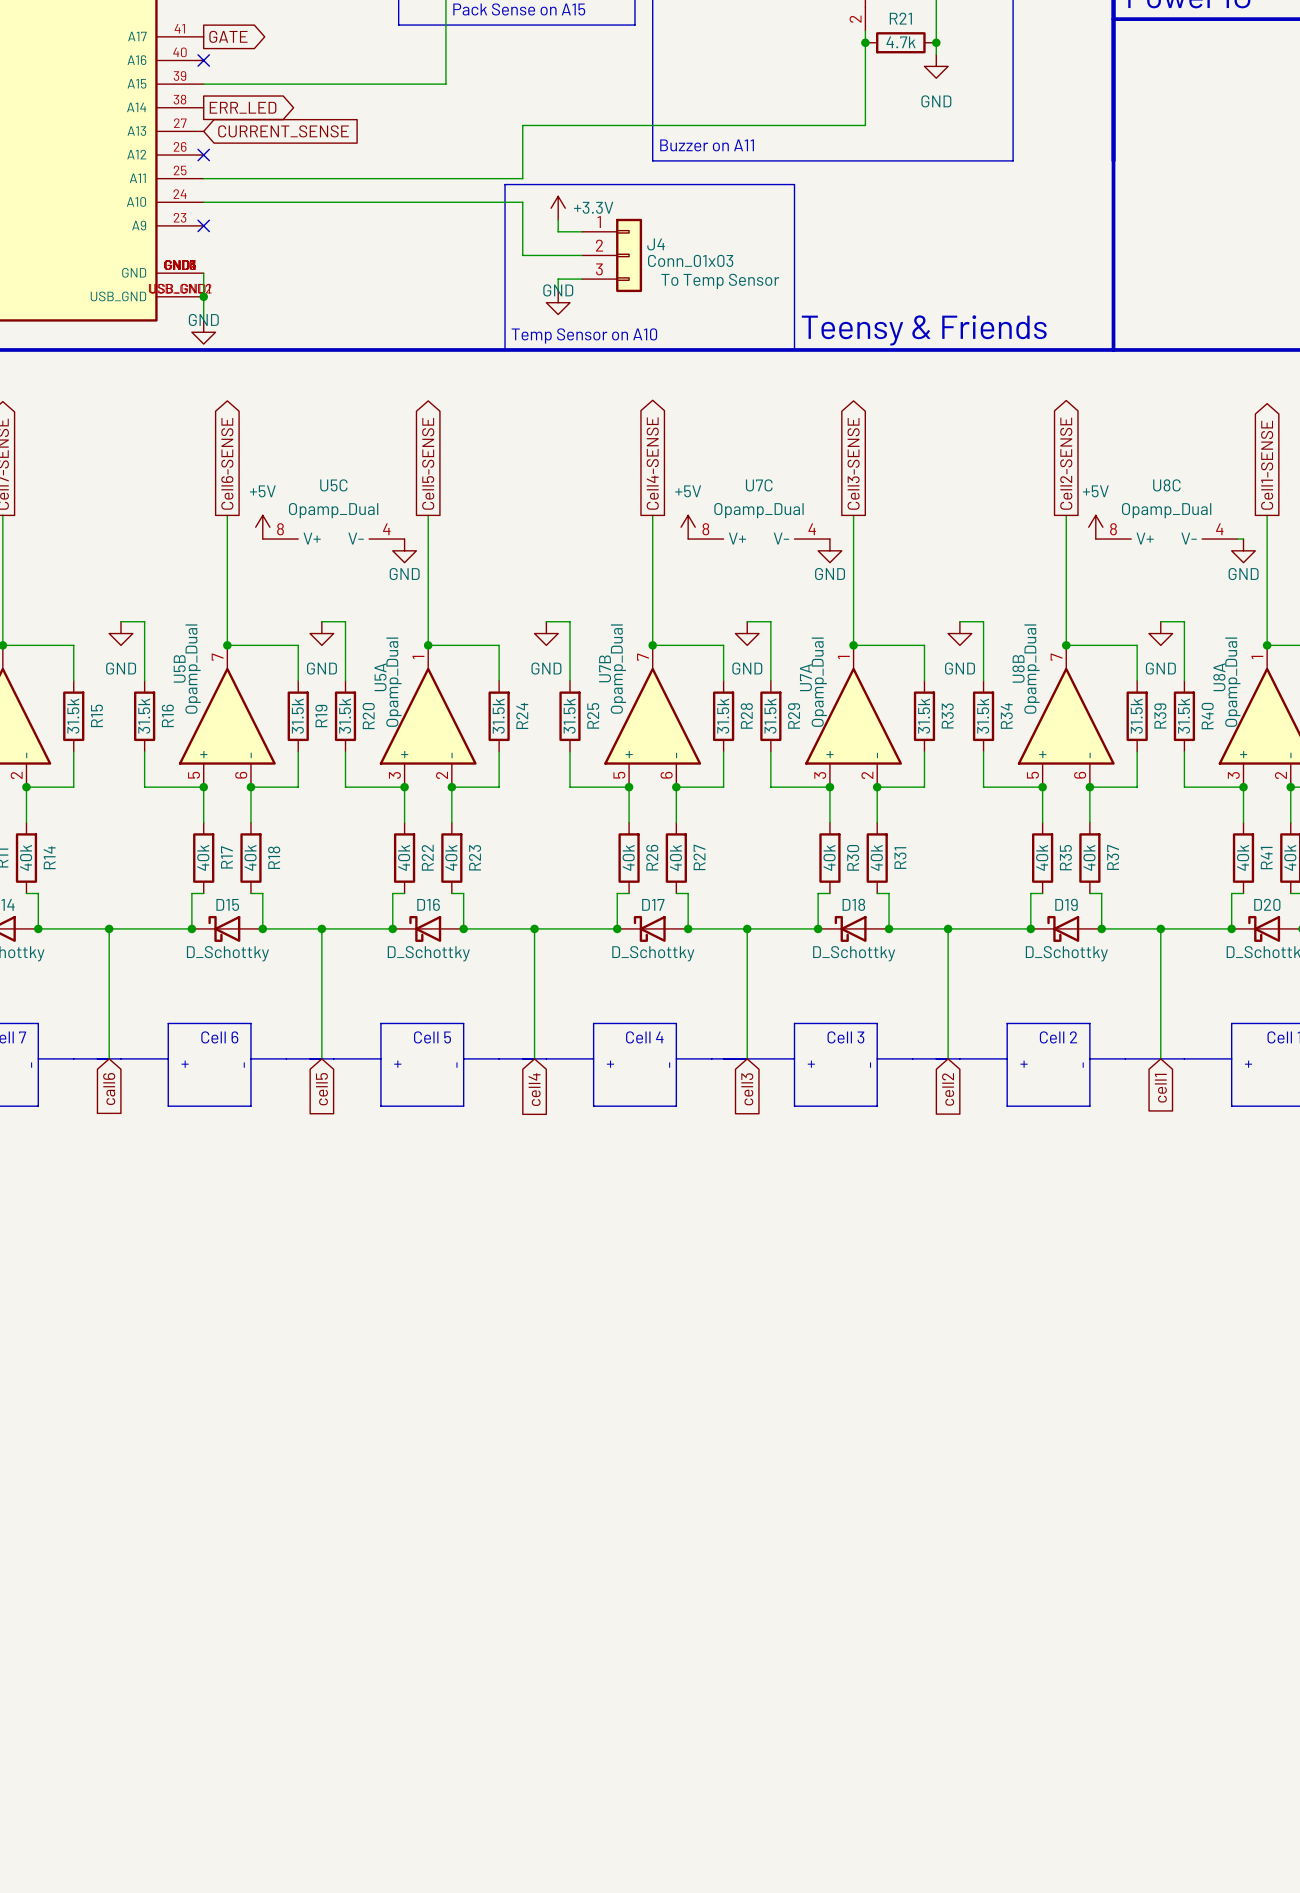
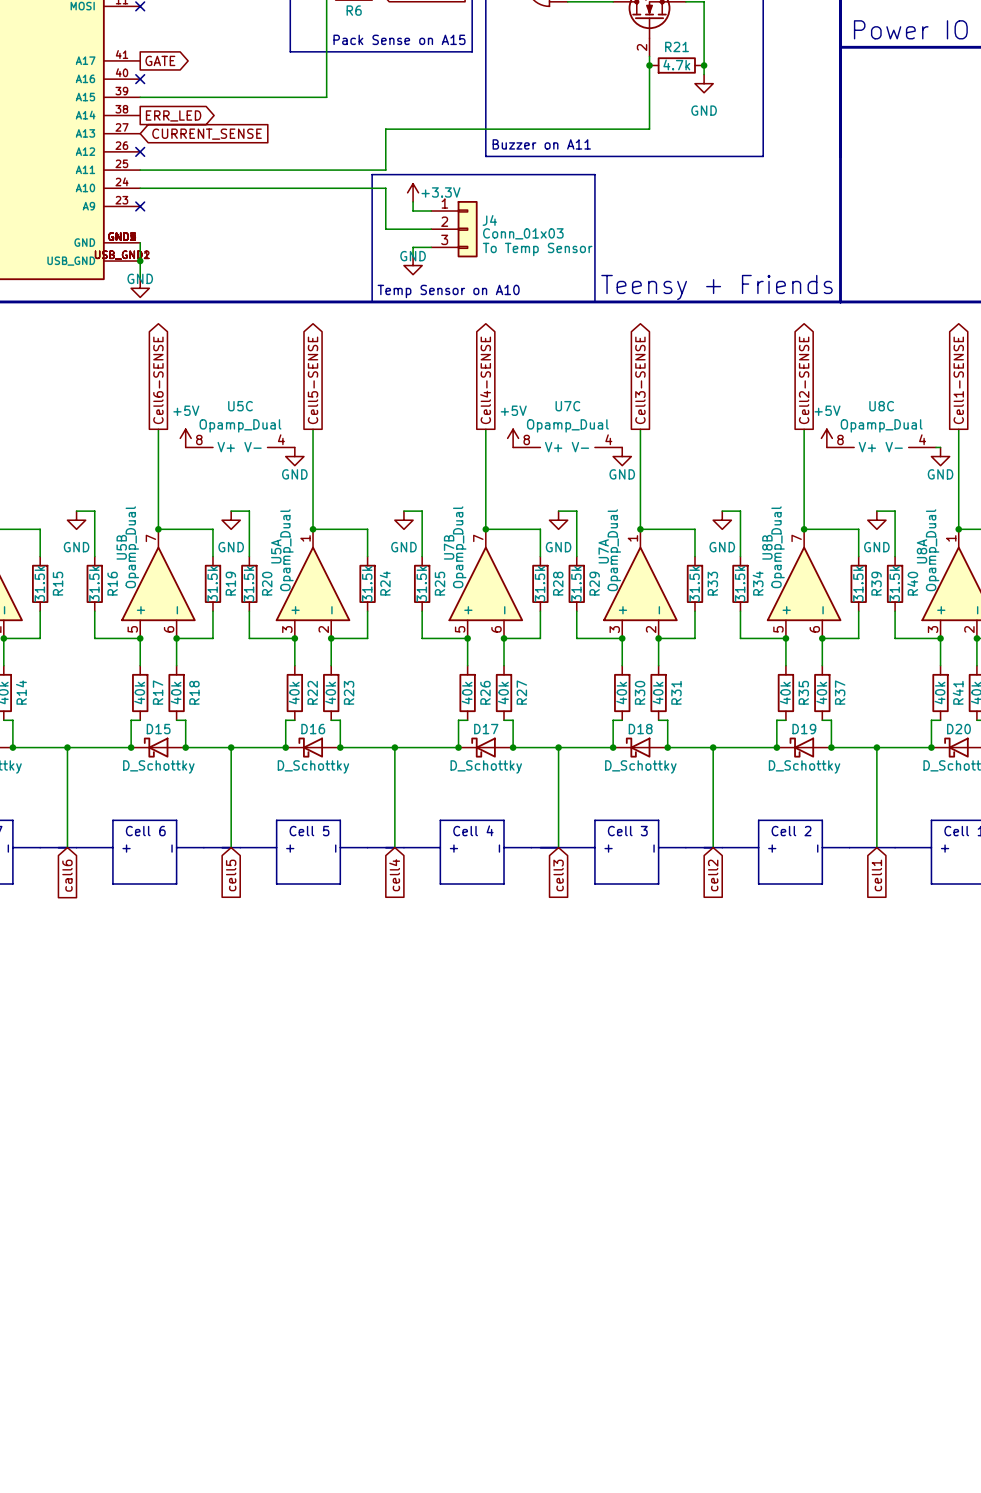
text: Teensy & Friends (924, 330) -> Teensy + Friends (717, 287)

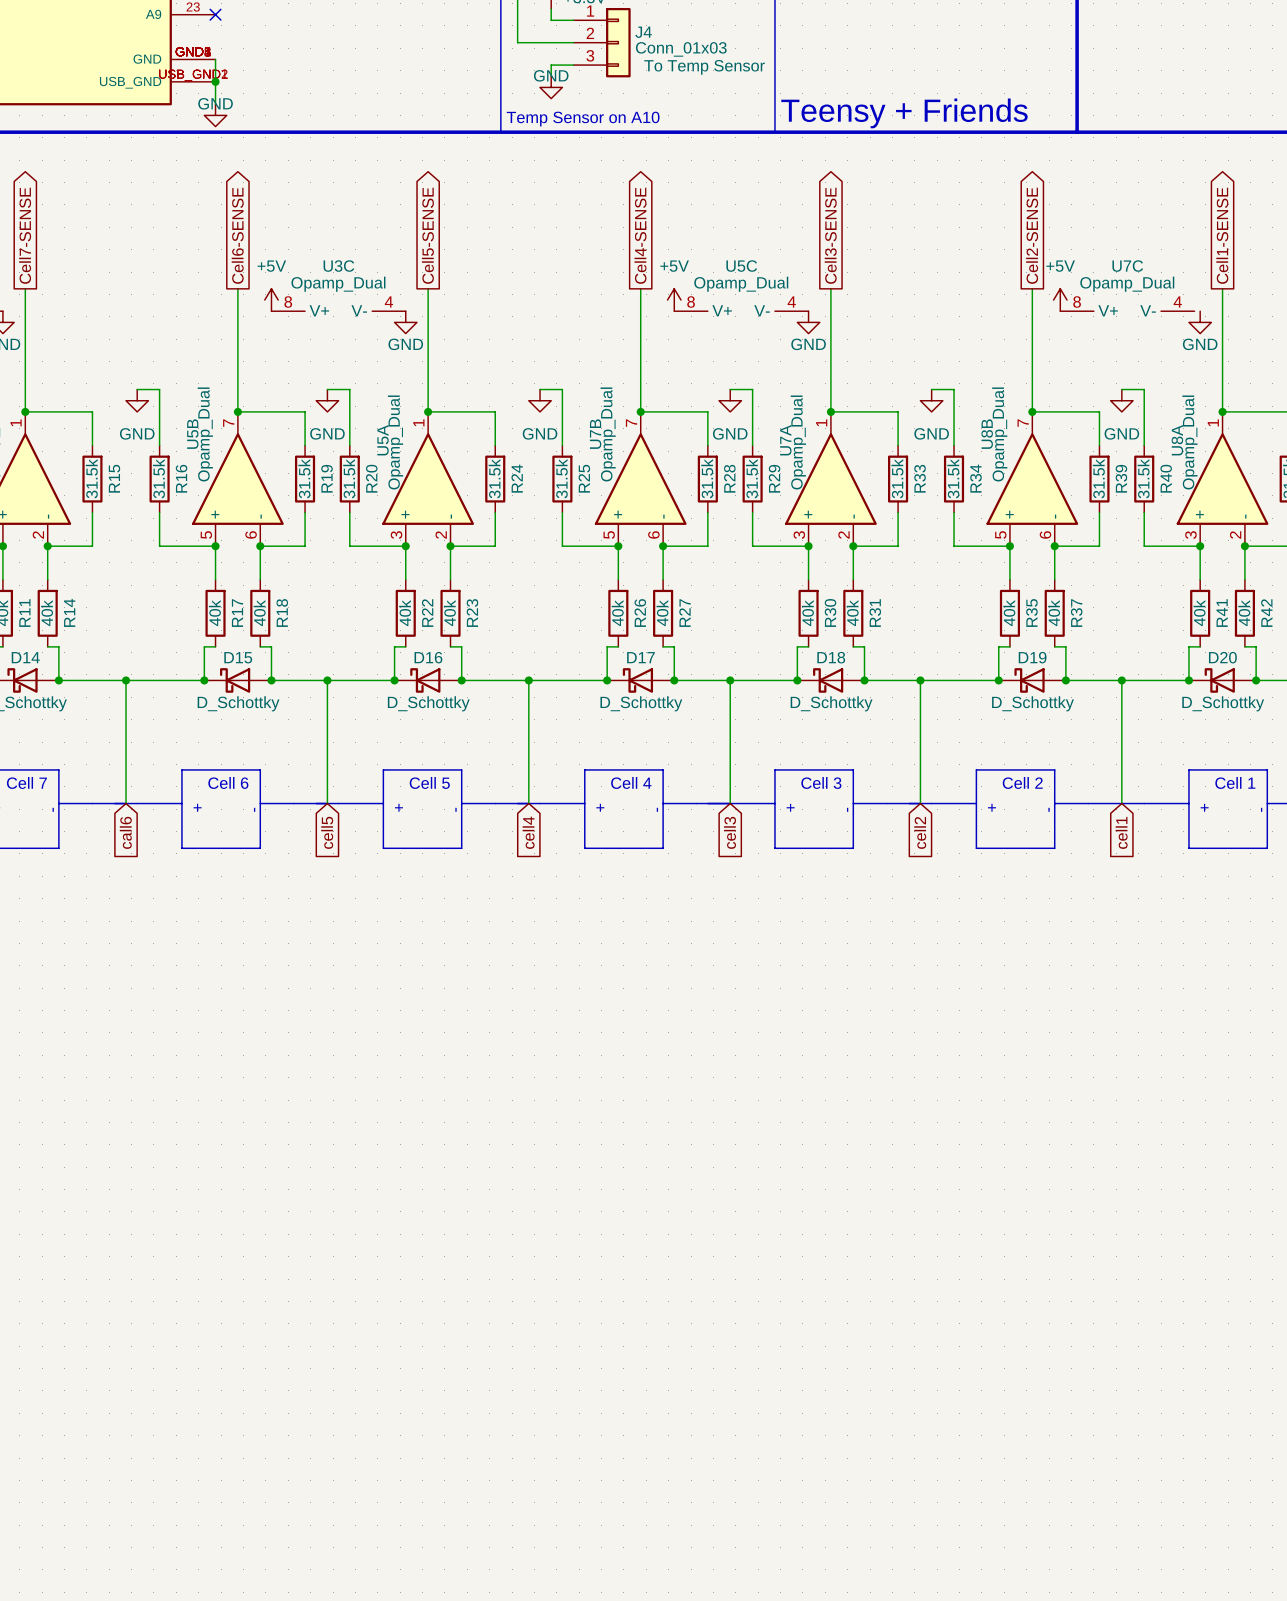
U5C name: U5C (240, 406) -> U3C (338, 266)
U7C name: U7C (567, 406) -> U5C (741, 266)
U8C name: U8C (881, 406) -> U7C (1127, 266)
wire: (935, 447) (940, 447) -> none

